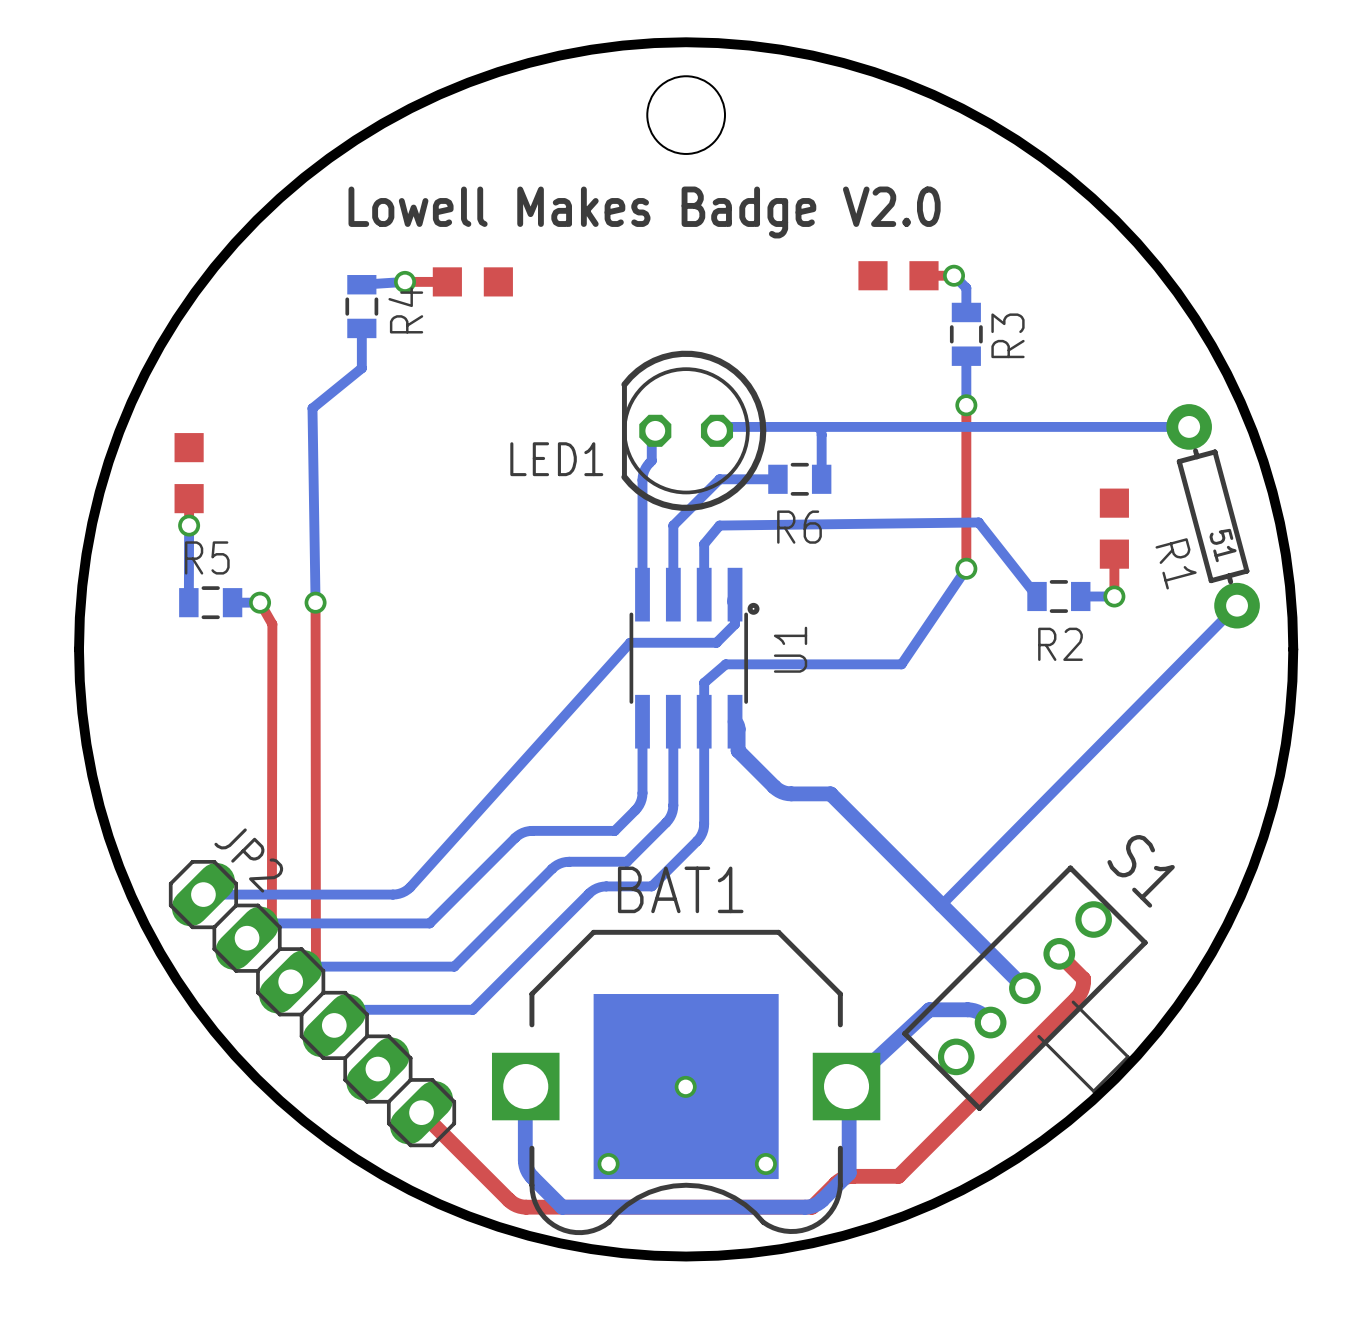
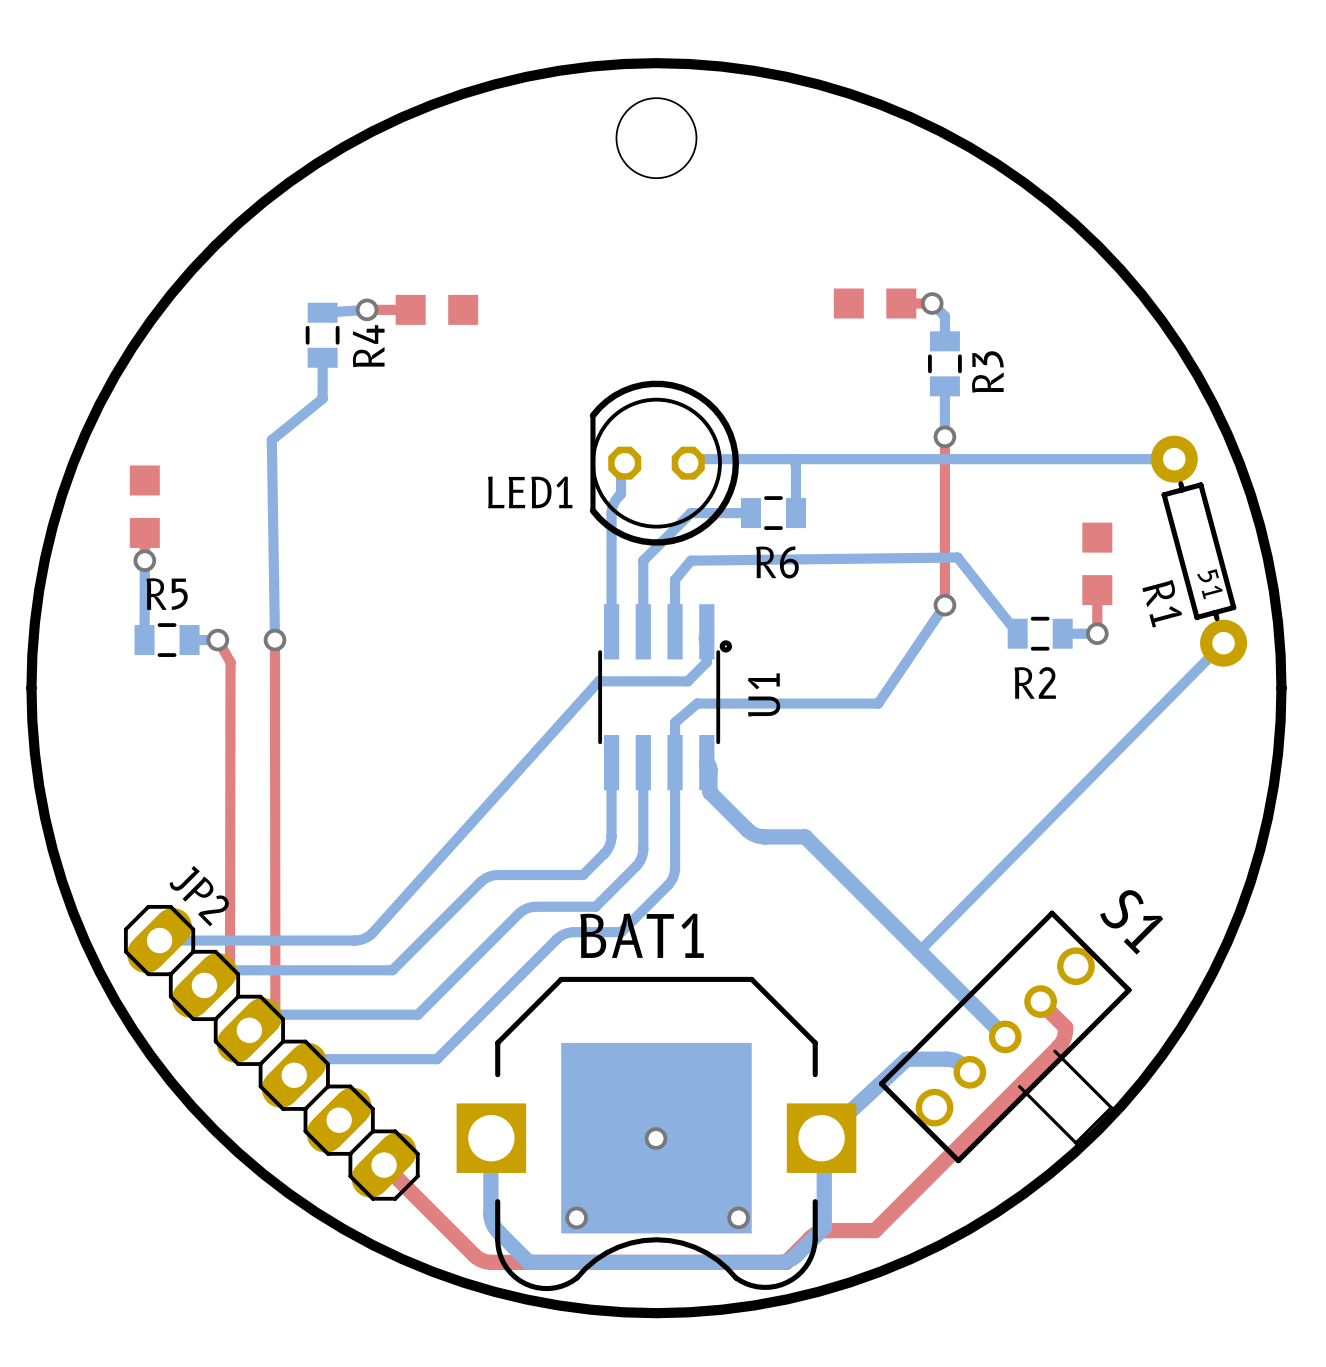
text: Lowell Makes Badge V2.0 (644, 212) -> none

